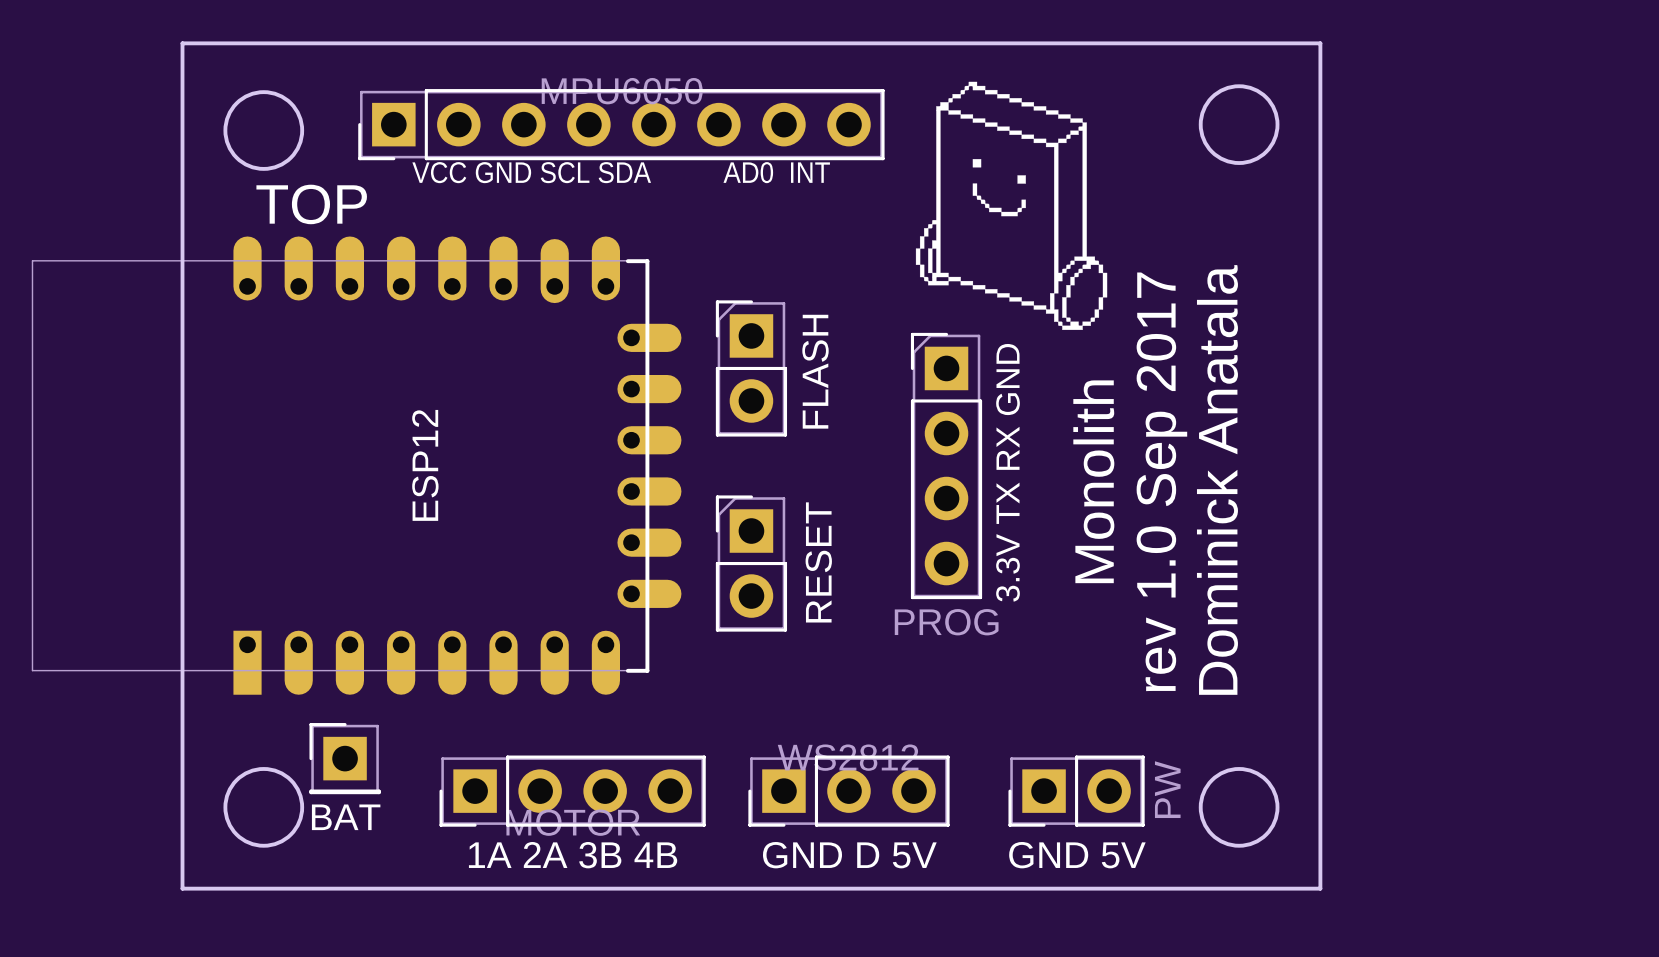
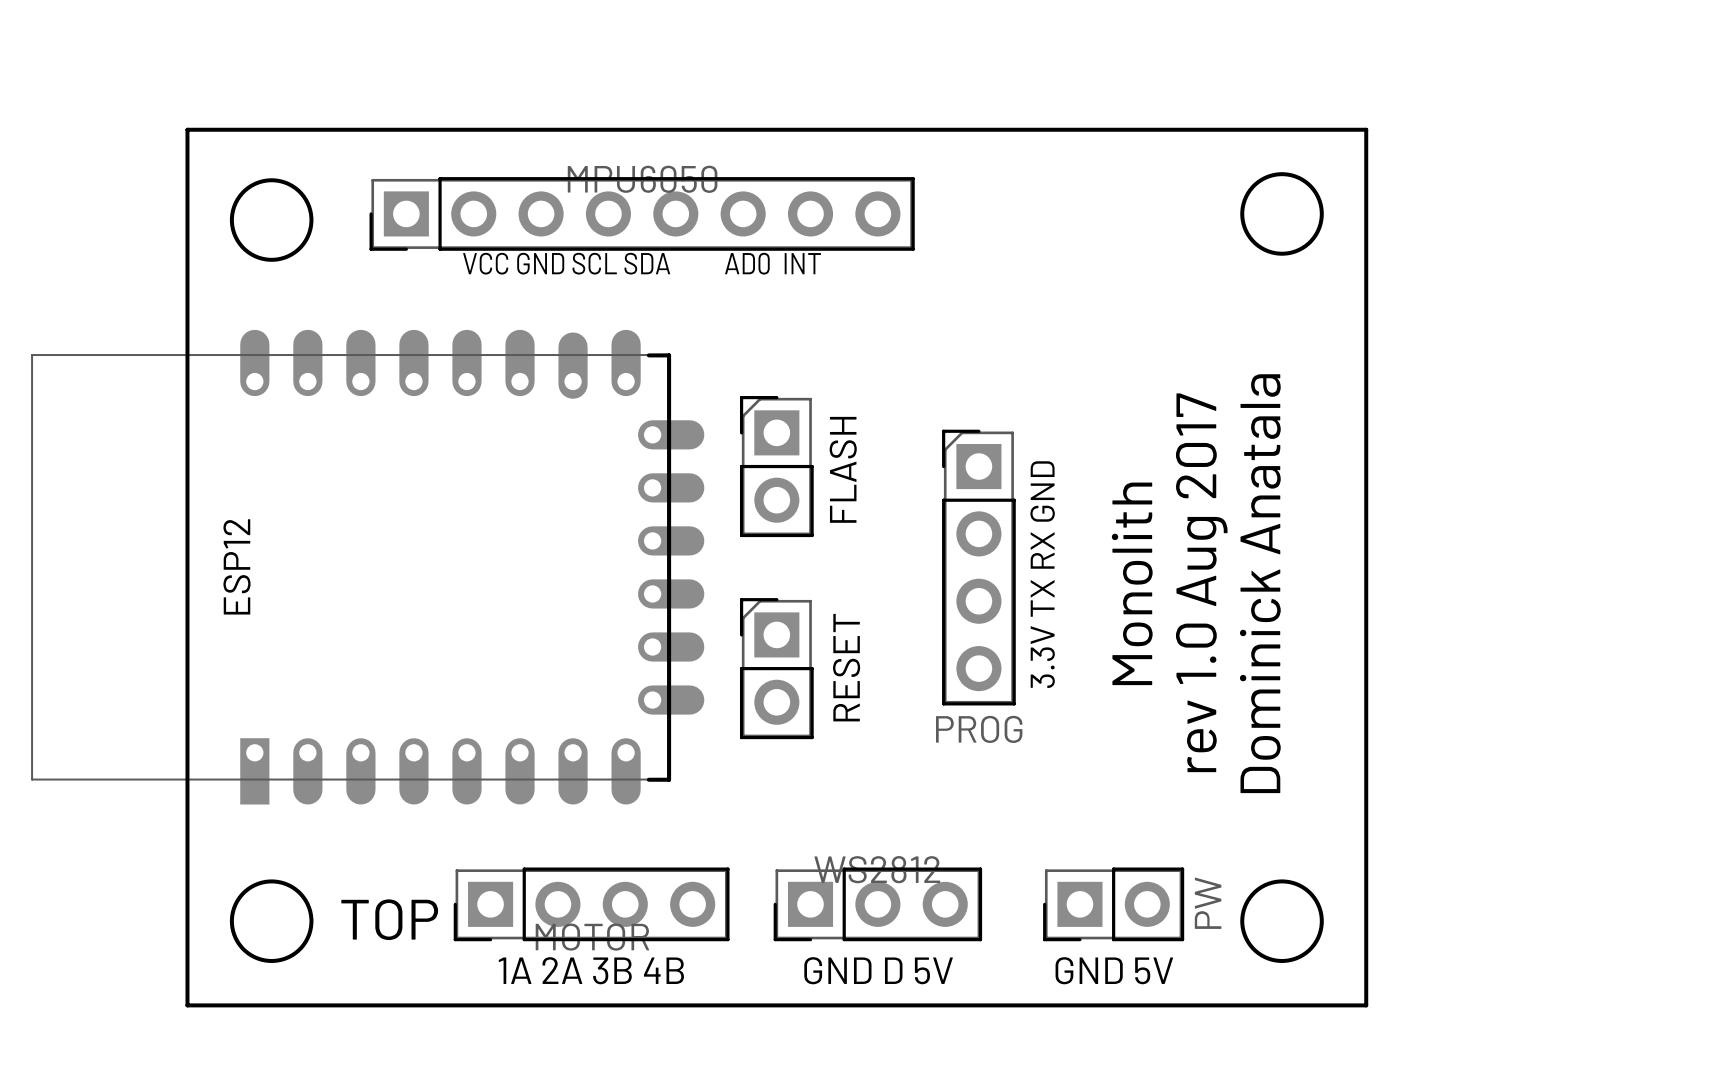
drawing: [915, 81, 1108, 330] -> none
text position: TOP (311, 204) -> TOP (389, 919)
ESP12 name position: ESP12 (425, 465) -> ESP12 (236, 566)
text: rev 1.0 Sep 2017 (1161, 481) -> rev 1.0 Aug 2017 (1201, 582)
part: BAT (345, 758) -> none

